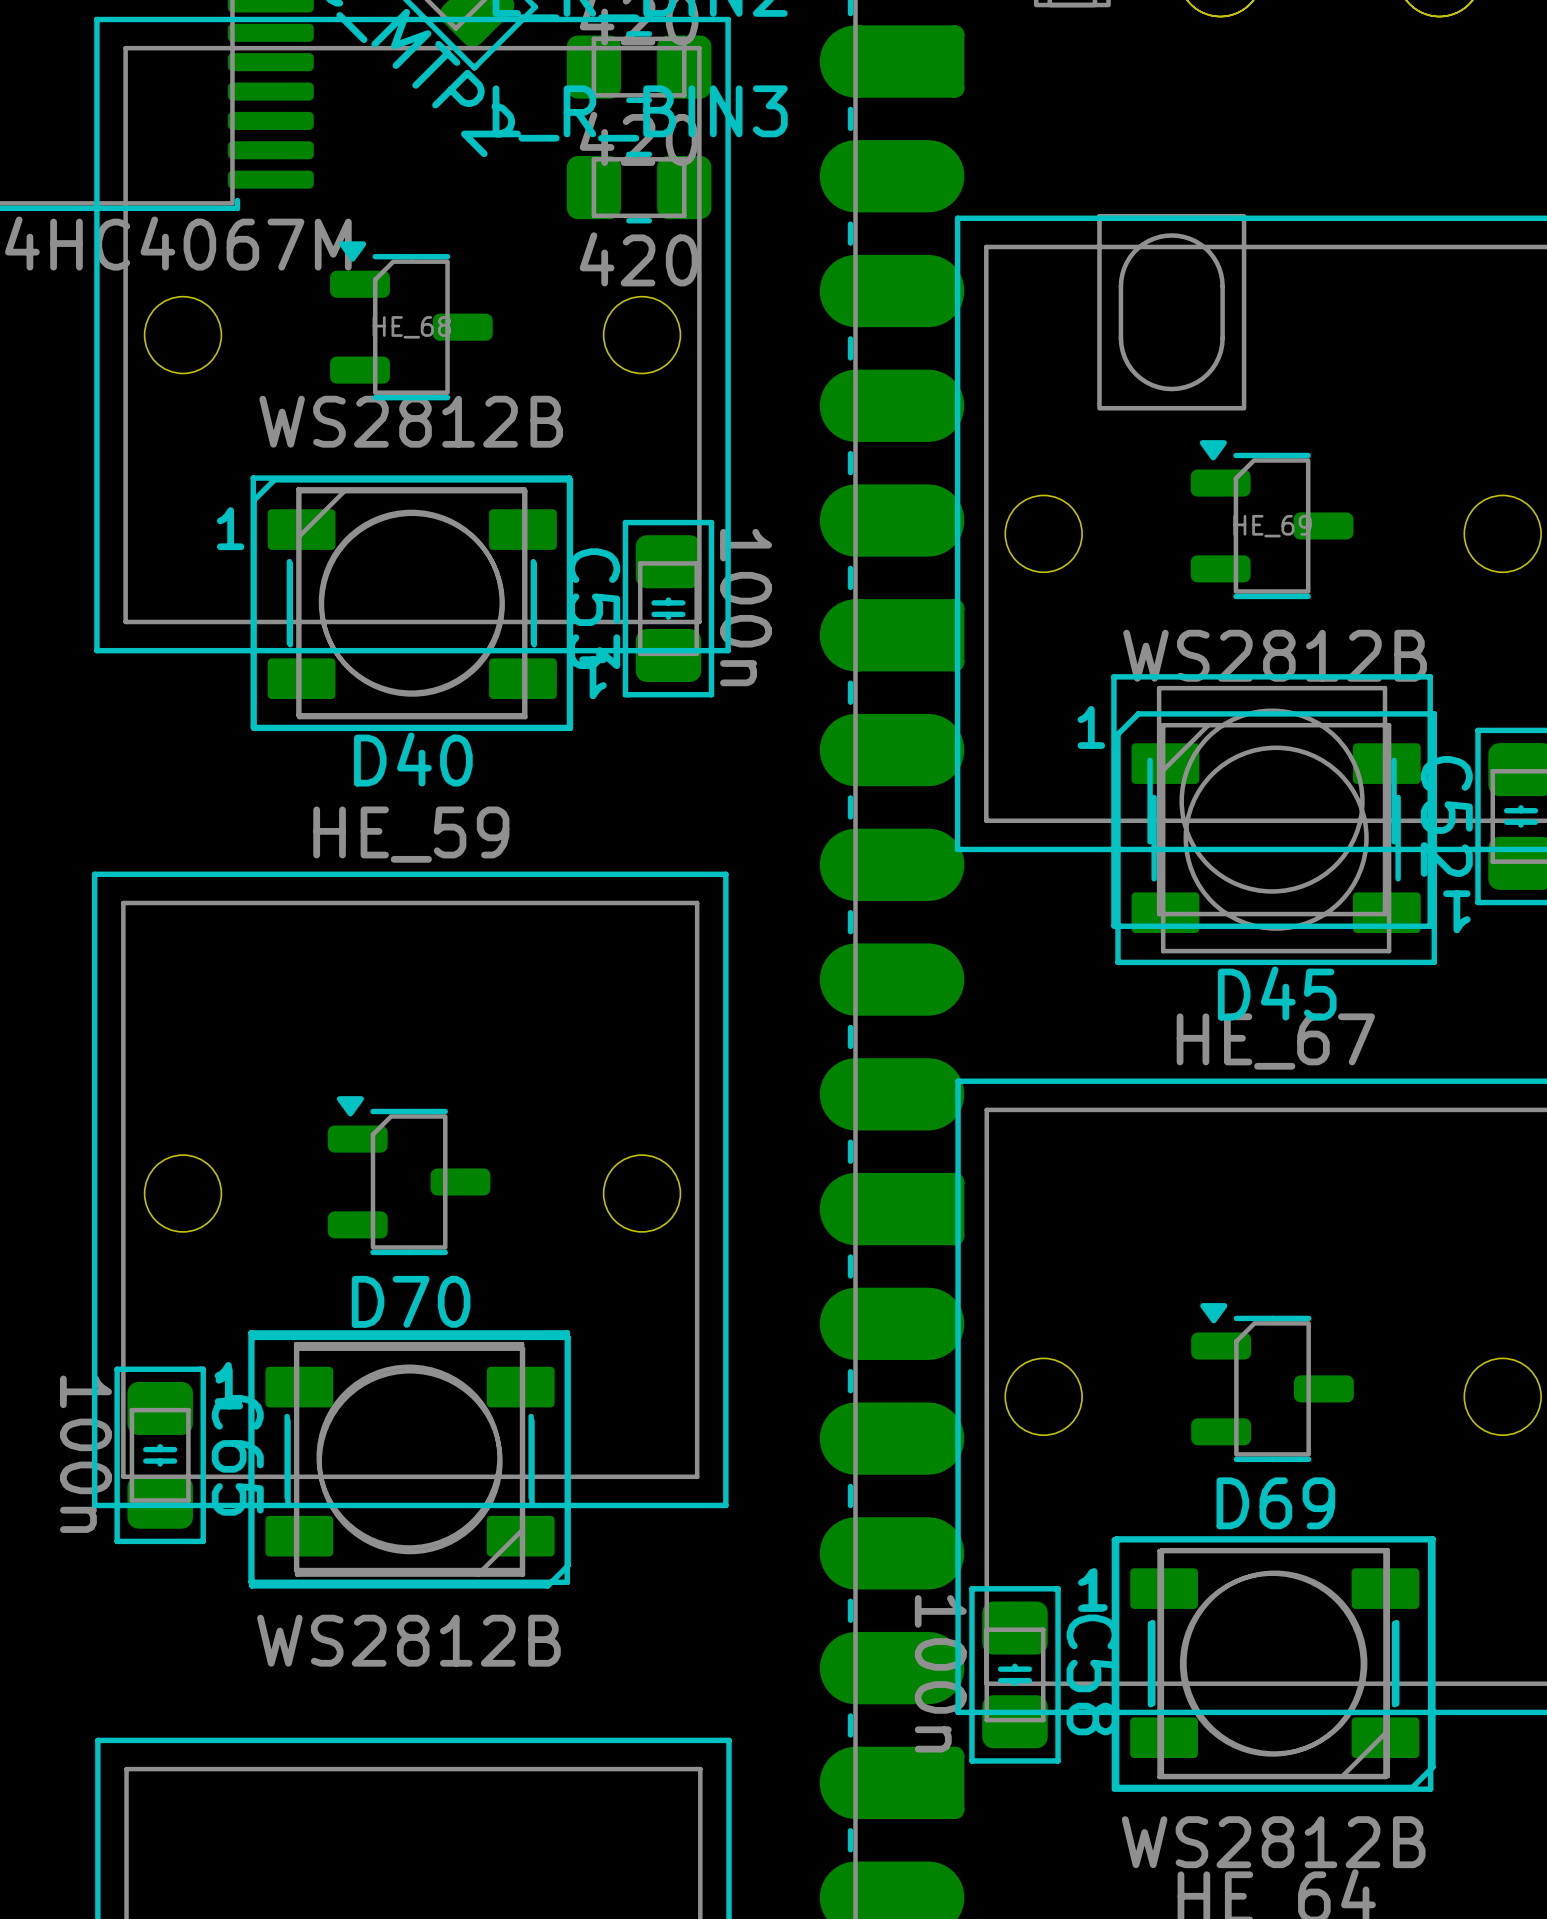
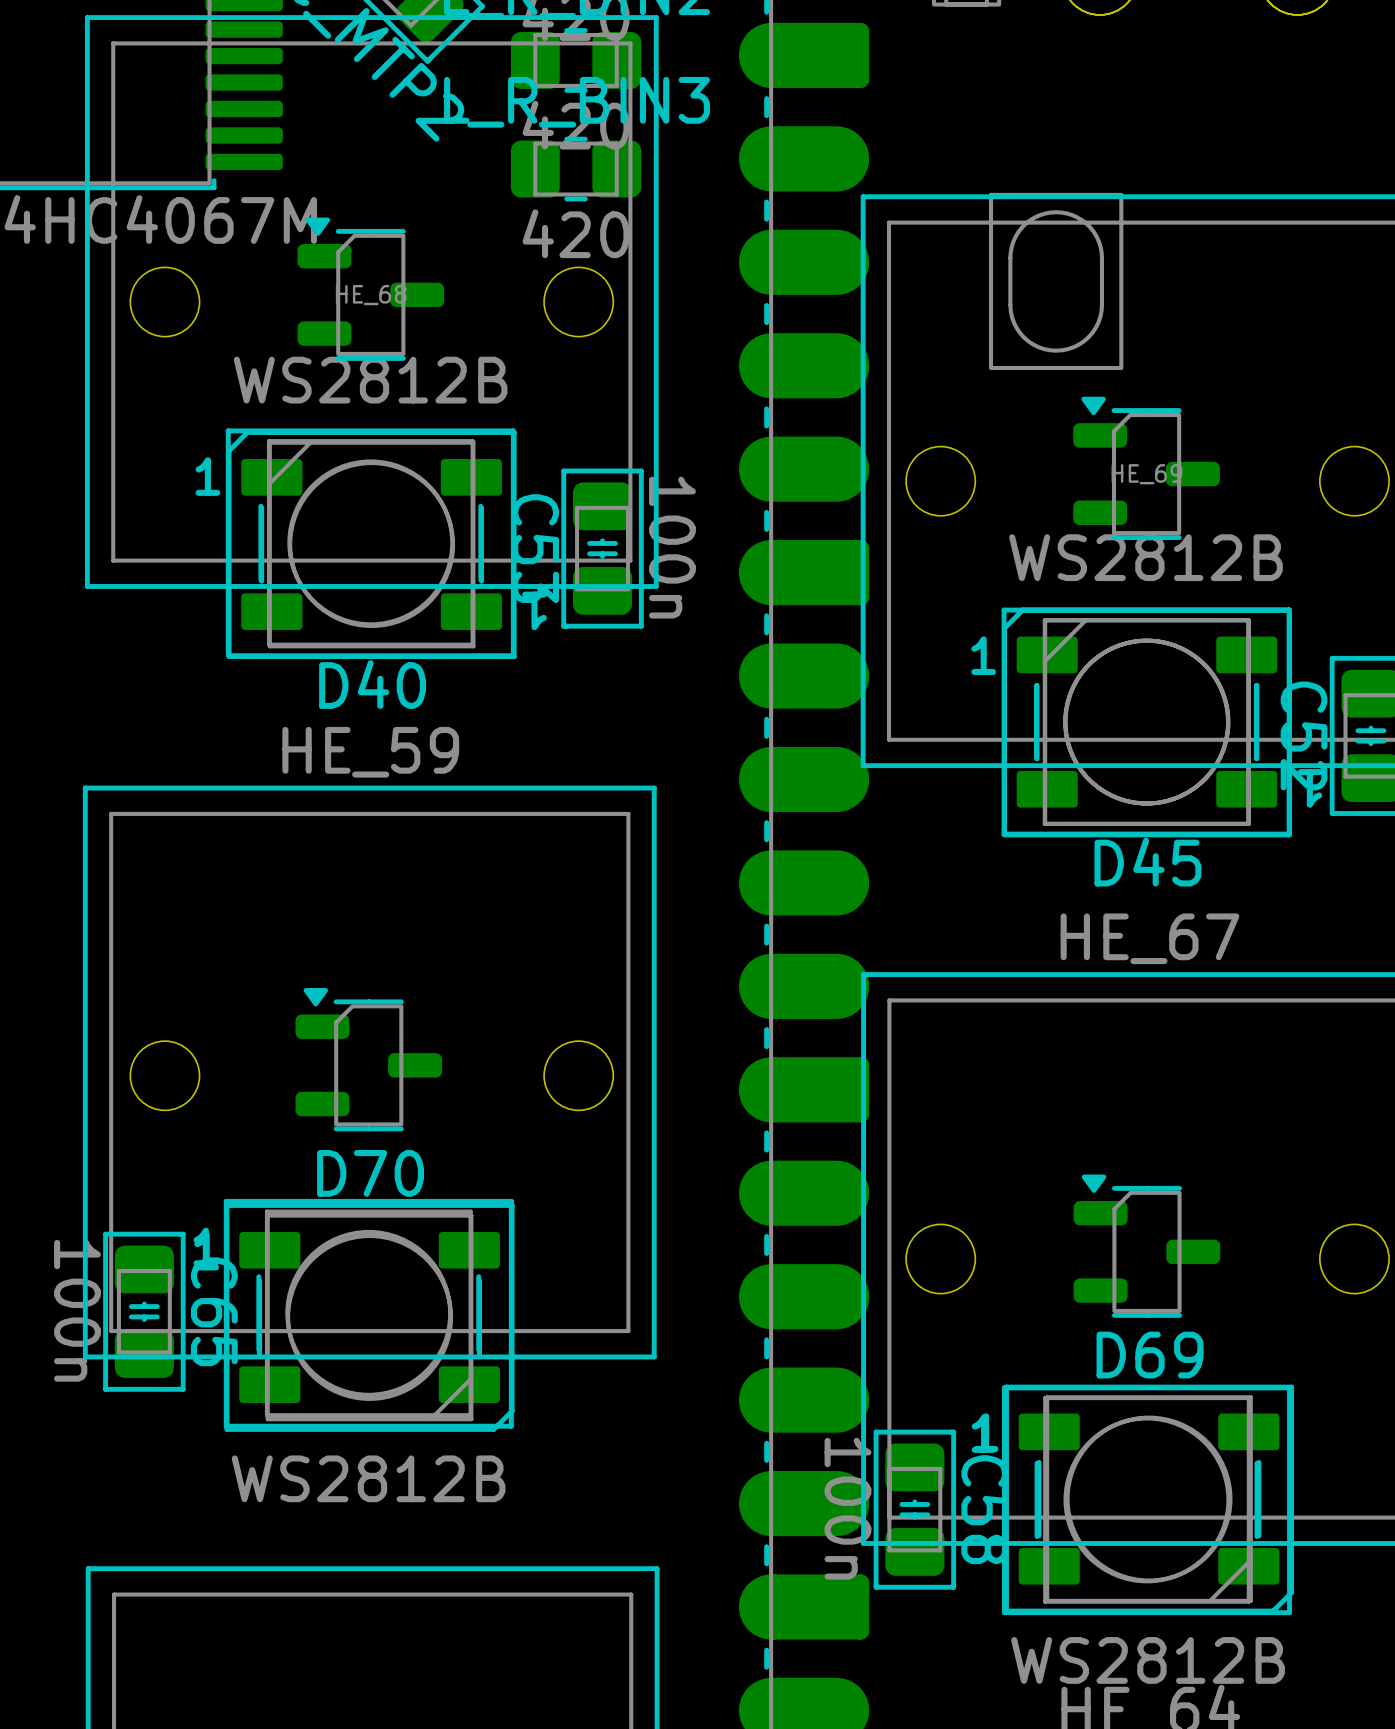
D45 position: (1276, 838) -> (1146, 722)

